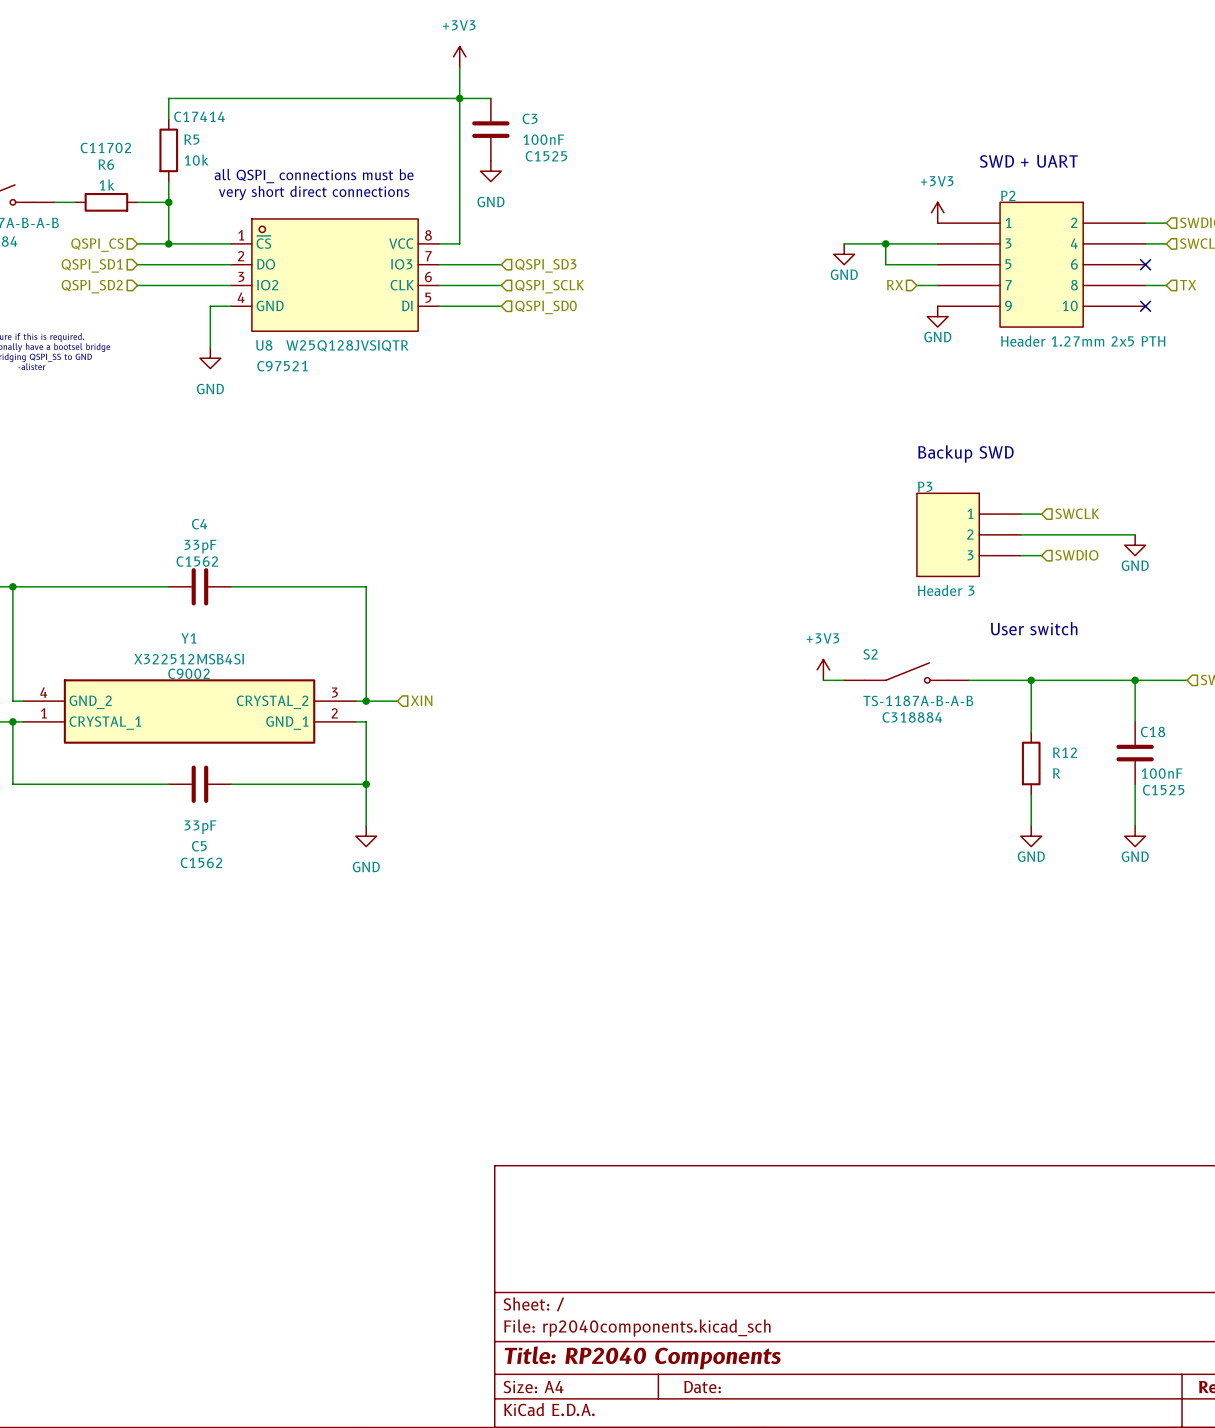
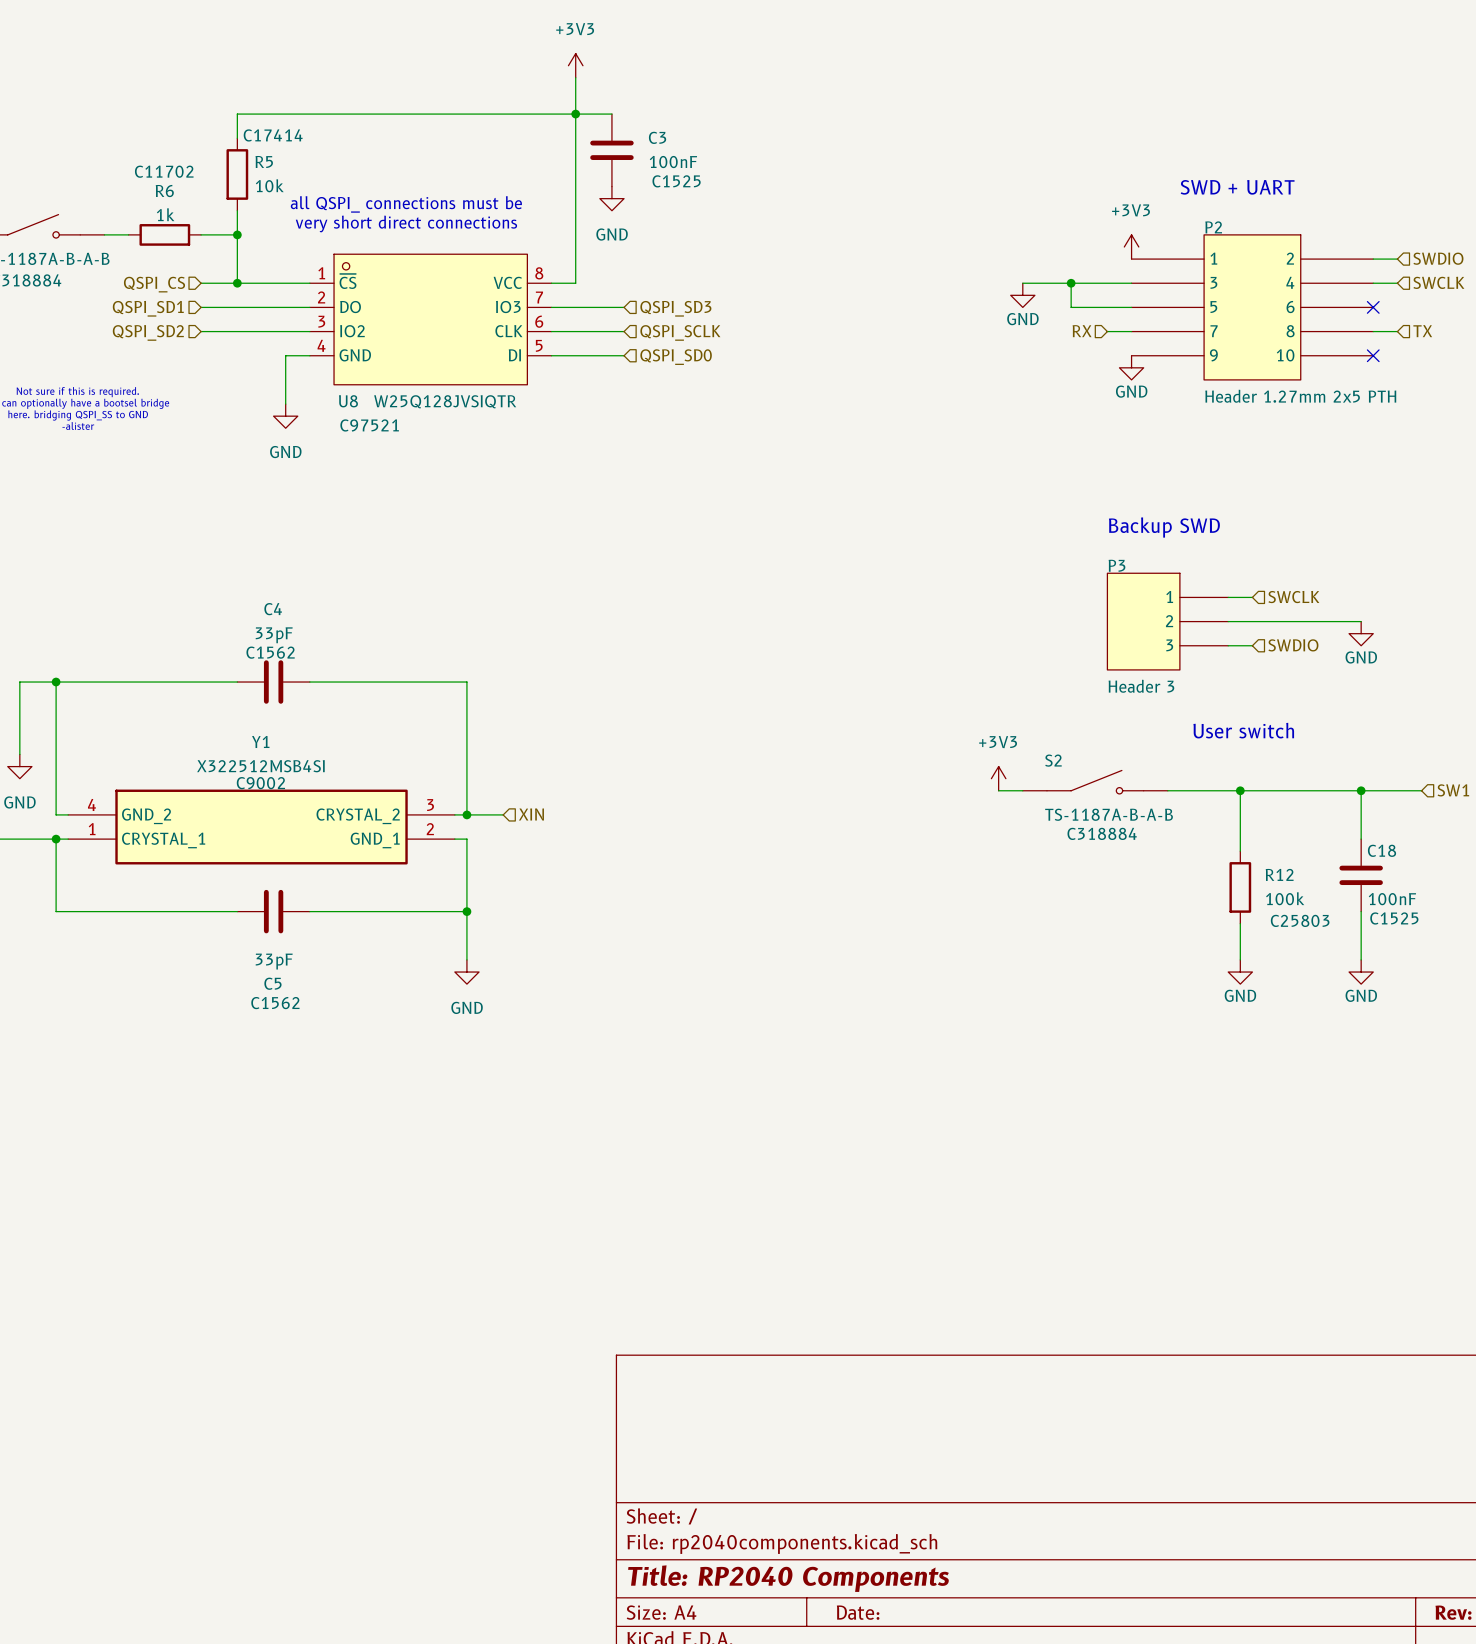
R12 value: R (1056, 773) -> 100k (1285, 898)
R12 text: none -> C25803 (1300, 920)

